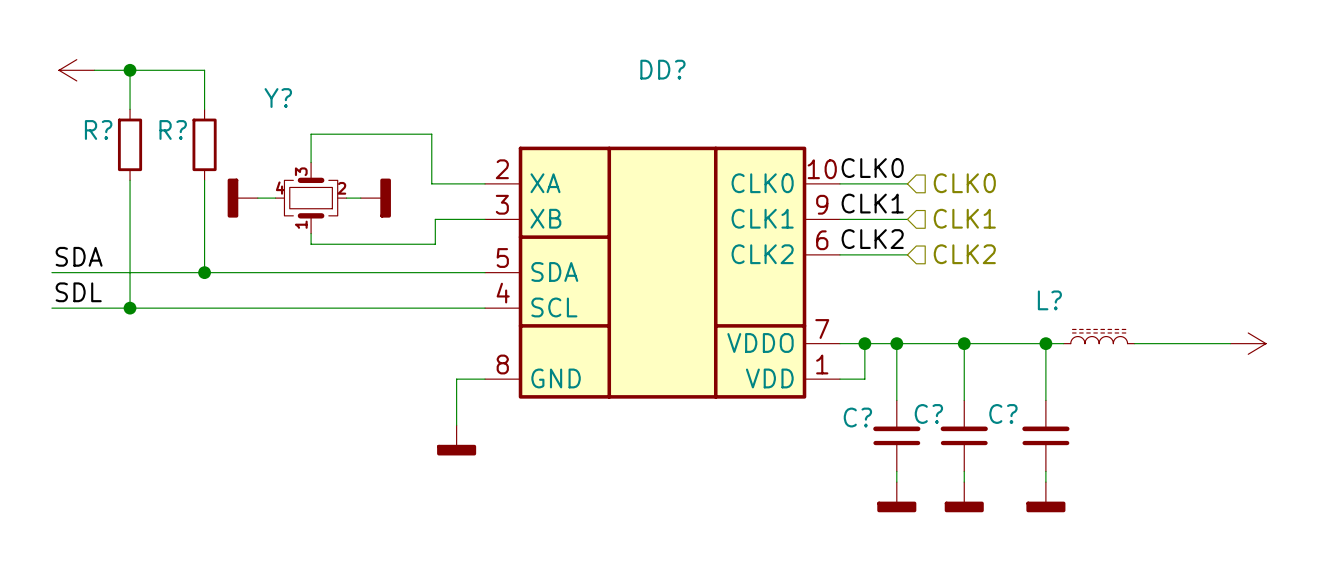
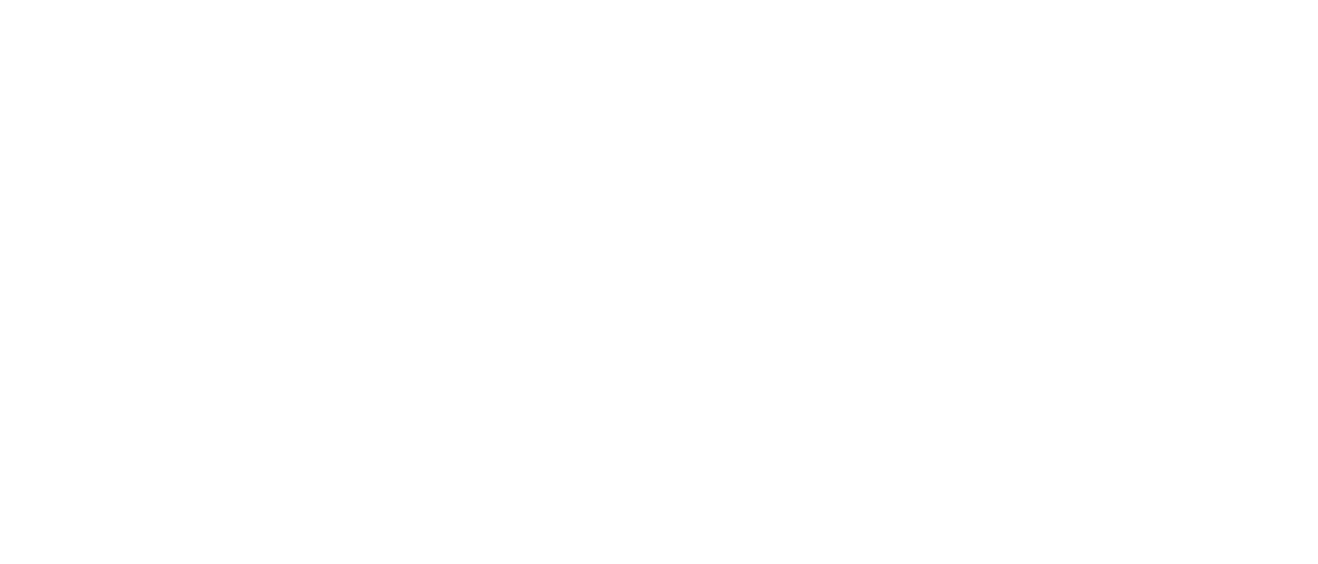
power symbol: (76, 70) -> none
wire: (94, 70) (204, 70) (204, 109) -> none
wire: (130, 70) (130, 109) -> none
junction: (130, 70) -> none
R?: (130, 144) -> none
R?: (204, 144) -> none
wire: (311, 162) (311, 134) (431, 134) (431, 183) (485, 183) -> none
label: CLK0 (872, 168) -> none
wire: (130, 180) (130, 308) -> none
wire: (204, 180) (204, 272) -> none
wire: (840, 183) (907, 183) -> none
hierarchical label: CLK0 (964, 183) -> none
power symbol: (242, 198) -> none
wire: (257, 198) (275, 198) -> none
Y?: (311, 198) -> none
wire: (346, 198) (360, 198) -> none
power symbol: (375, 198) -> none
label: CLK1 (872, 203) -> none
hierarchical label: CLK1 (964, 218) -> none
wire: (485, 219) (435, 219) (435, 244) (311, 244) (311, 233) -> none
wire: (840, 219) (907, 219) -> none
label: CLK2 (872, 239) -> none
wire: (840, 254) (907, 254) -> none
hierarchical label: CLK2 (964, 254) -> none
label: SDA (79, 256) -> none
wire: (51, 272) (485, 272) -> none
junction: (204, 272) -> none
DD?: (662, 272) -> none
label: SDL (78, 292) -> none
wire: (51, 308) (485, 308) -> none
junction: (130, 308) -> none
L?: (1099, 336) -> none
wire: (840, 343) (1063, 343) -> none
wire: (864, 343) (864, 379) (840, 379) -> none
junction: (864, 343) -> none
wire: (896, 343) (896, 400) -> none
junction: (896, 343) -> none
wire: (964, 343) (964, 400) -> none
junction: (964, 343) -> none
wire: (1045, 343) (1045, 400) -> none
junction: (1045, 343) -> none
wire: (1134, 343) (1230, 343) -> none
power symbol: (1248, 343) -> none
wire: (485, 379) (456, 379) (456, 425) -> none
C?: (896, 435) -> none
C?: (964, 435) -> none
C?: (1045, 435) -> none
power symbol: (456, 440) -> none
wire: (896, 471) (896, 482) -> none
wire: (964, 471) (964, 482) -> none
wire: (1045, 471) (1045, 482) -> none
power symbol: (896, 497) -> none
power symbol: (964, 497) -> none
power symbol: (1045, 497) -> none

